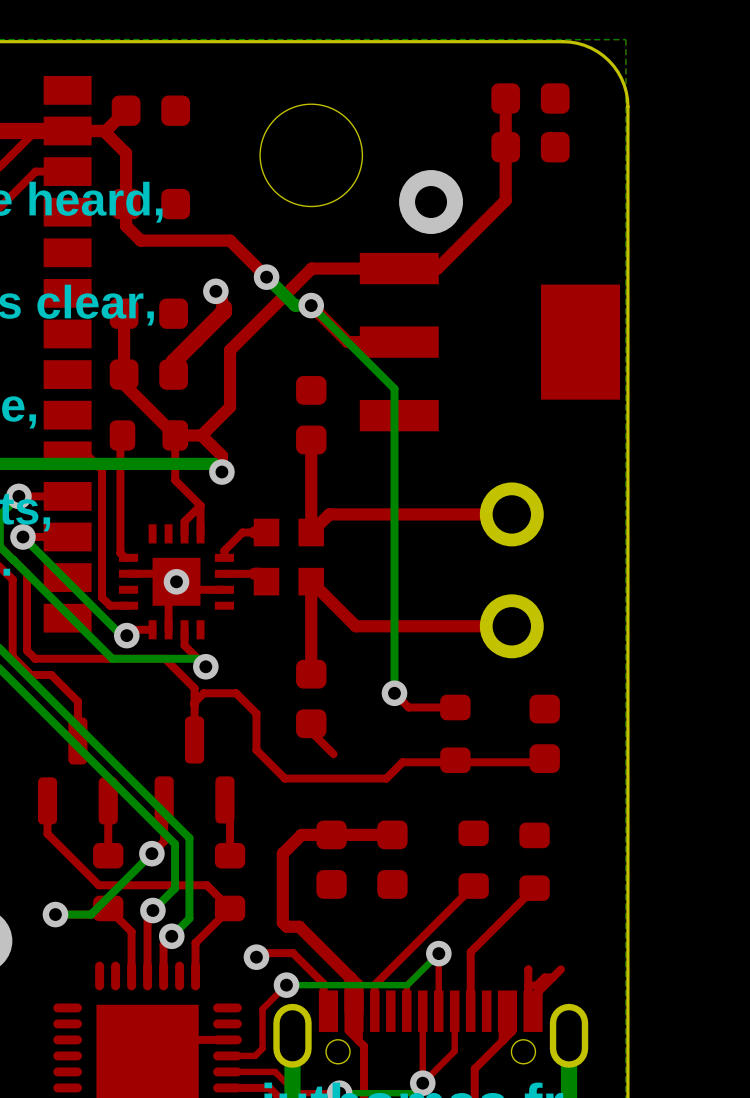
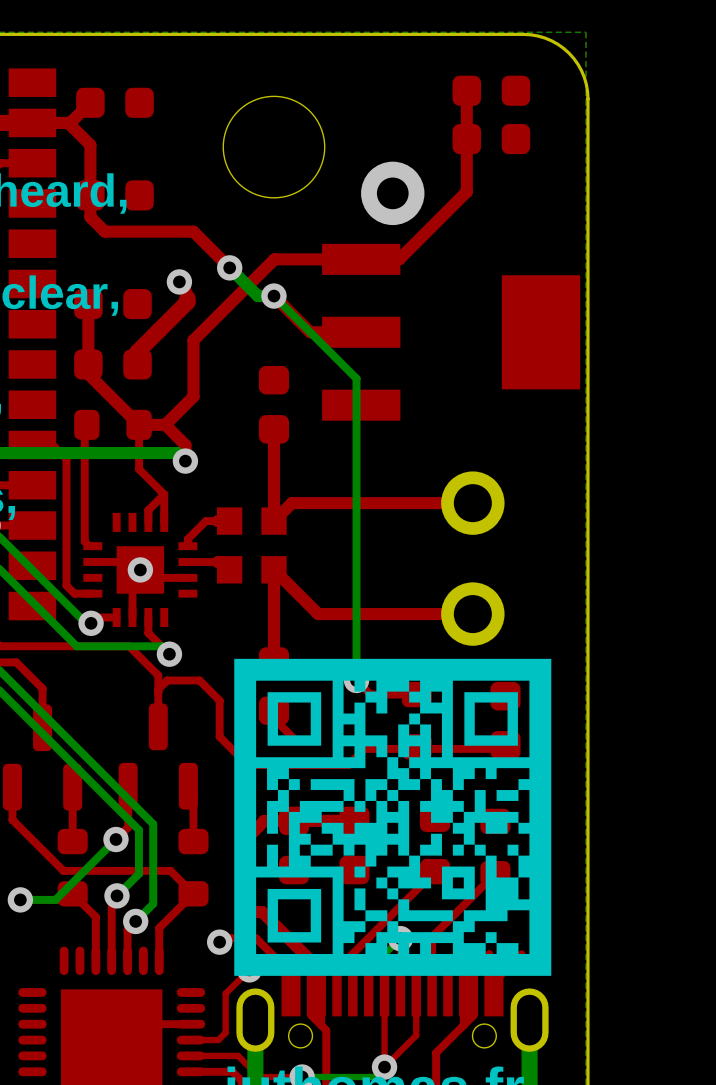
drawing: none -> [234, 658, 552, 976]

